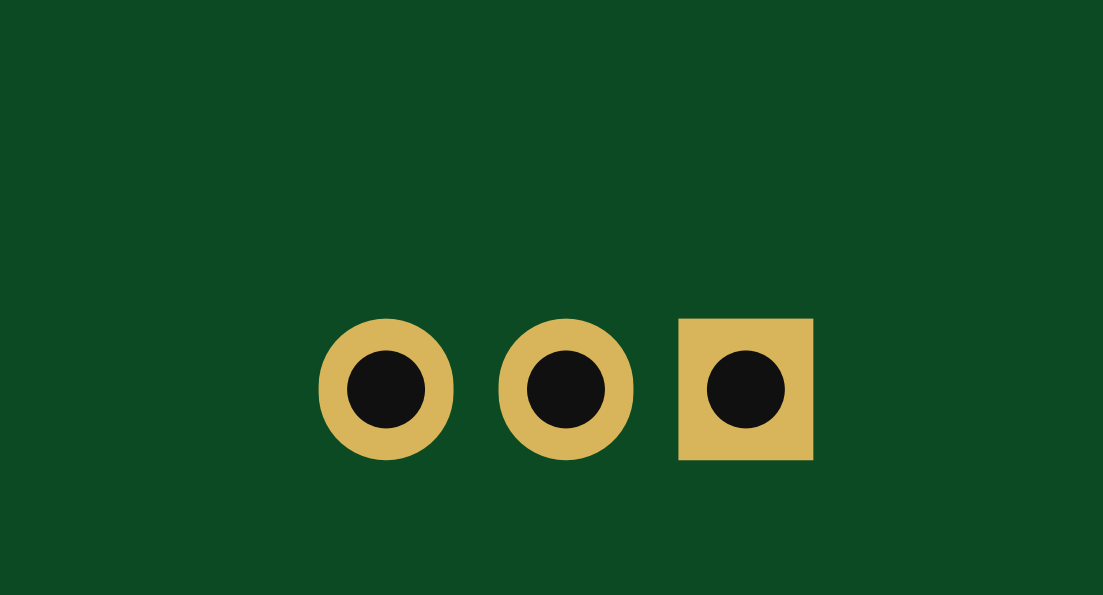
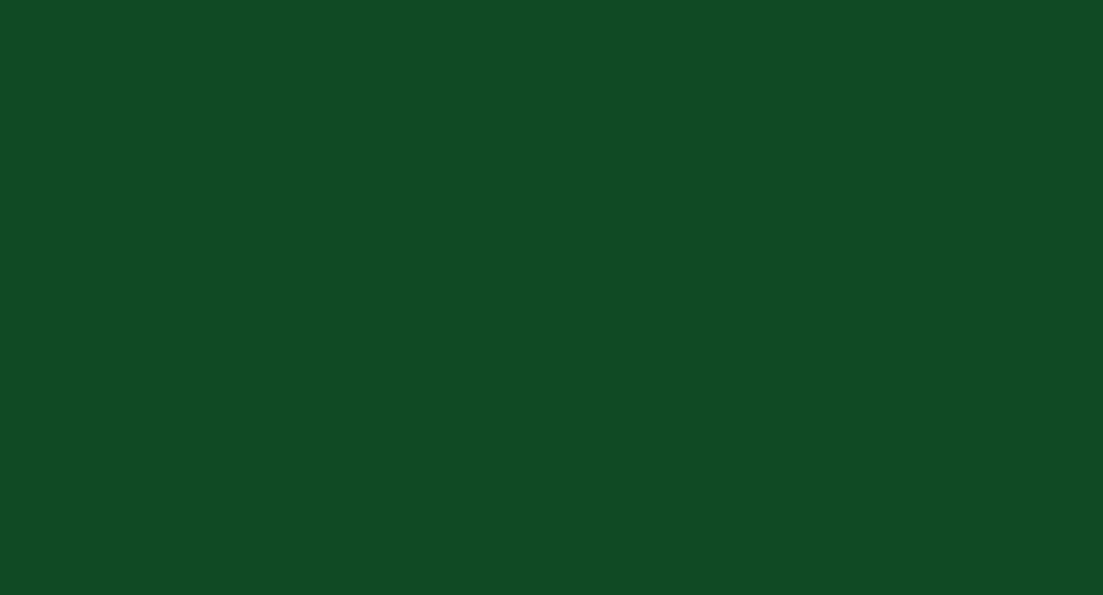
part: (565, 389) -> none

